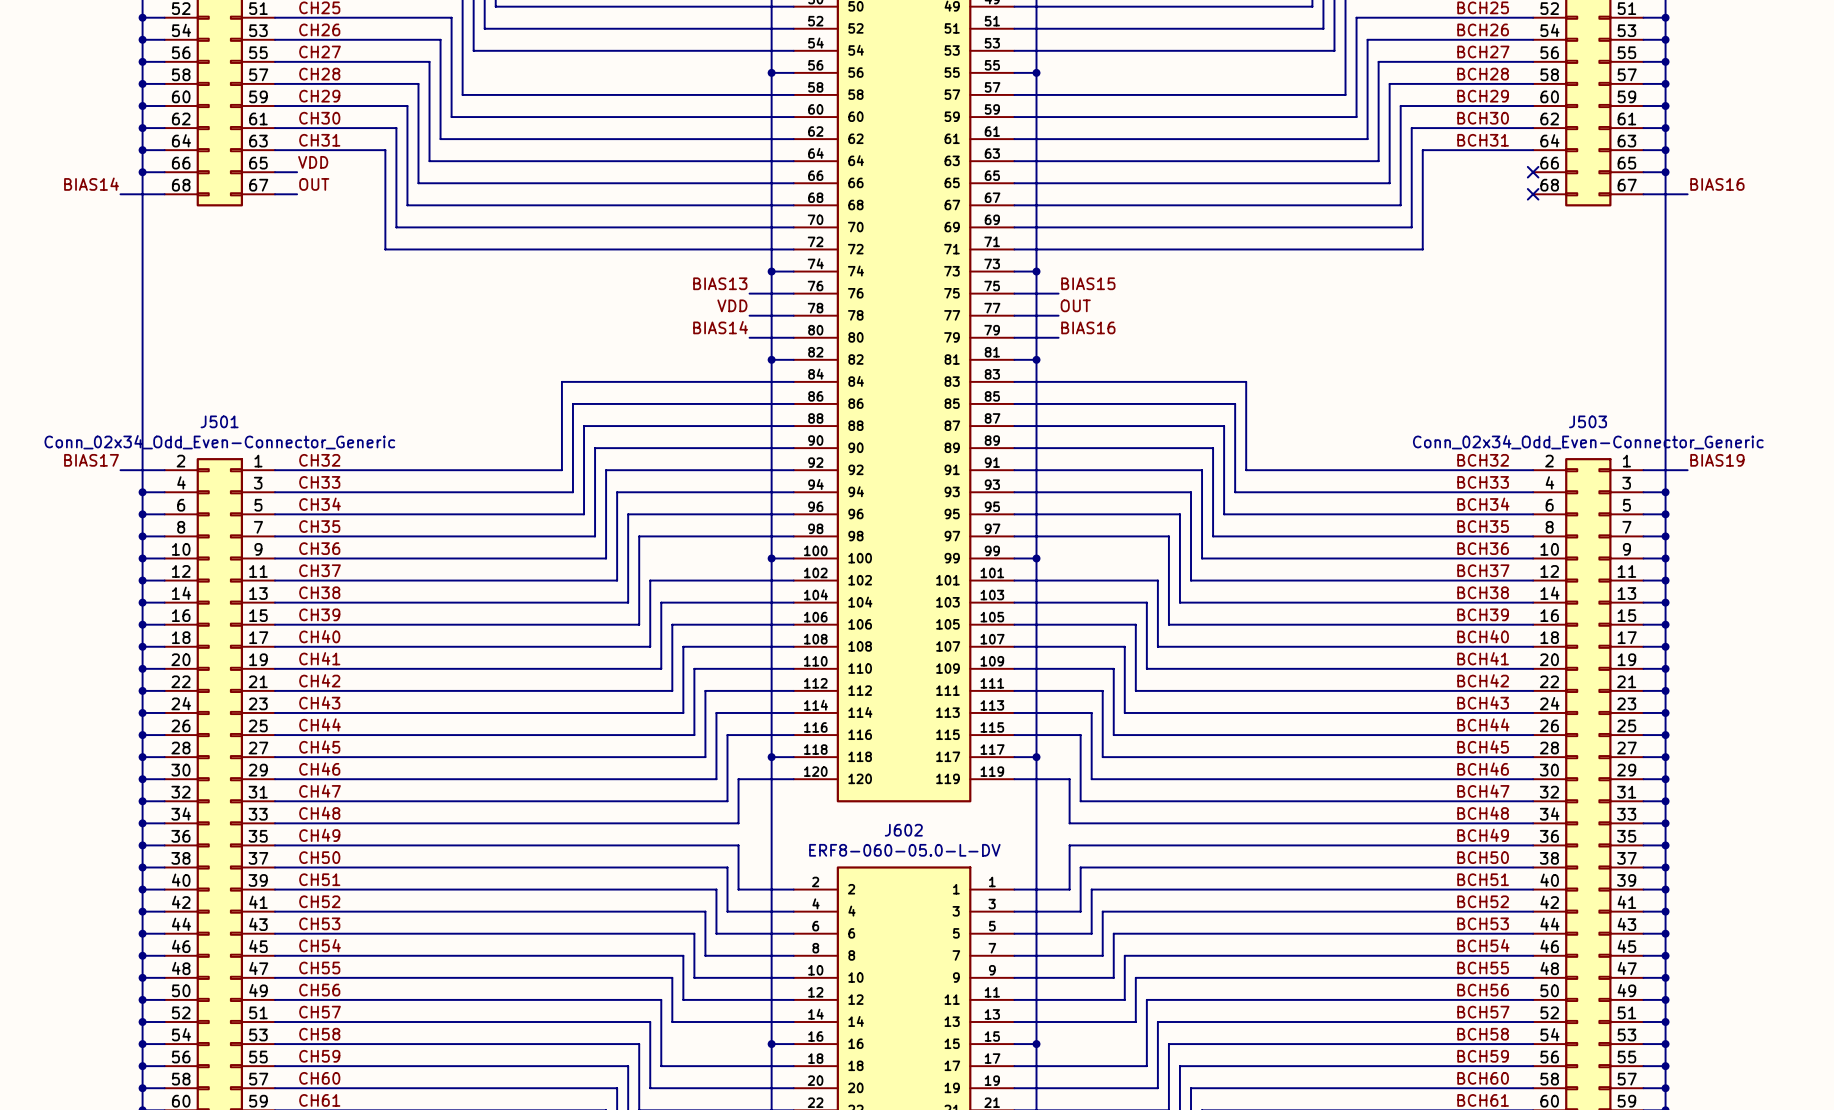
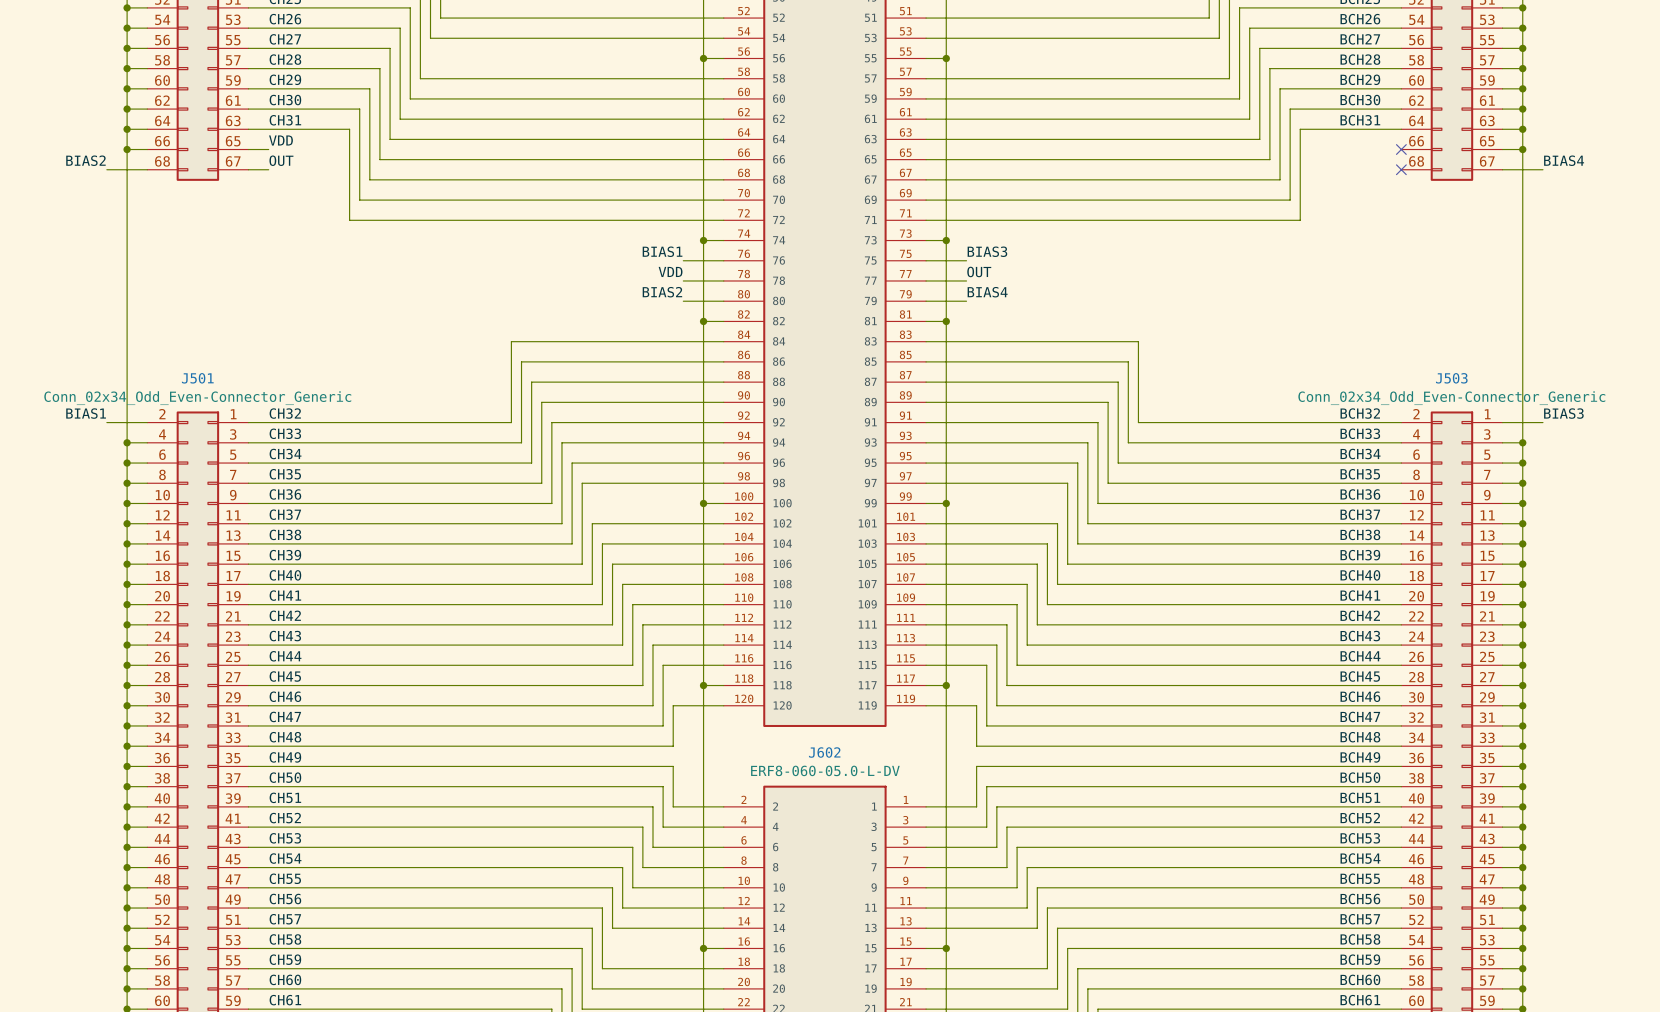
label: BIAS14 (91, 184) -> BIAS2 (85, 160)
label: BIAS16 (1717, 184) -> BIAS4 (1564, 160)
label: BIAS13 (720, 283) -> BIAS1 (662, 251)
label: BIAS15 (1088, 283) -> BIAS3 (987, 251)
label: BIAS14 (720, 327) -> BIAS2 (662, 292)
label: BIAS16 (1088, 327) -> BIAS4 (987, 292)
label: BIAS17 (91, 460) -> BIAS1 (86, 413)
label: BIAS19 (1717, 460) -> BIAS3 (1563, 413)

